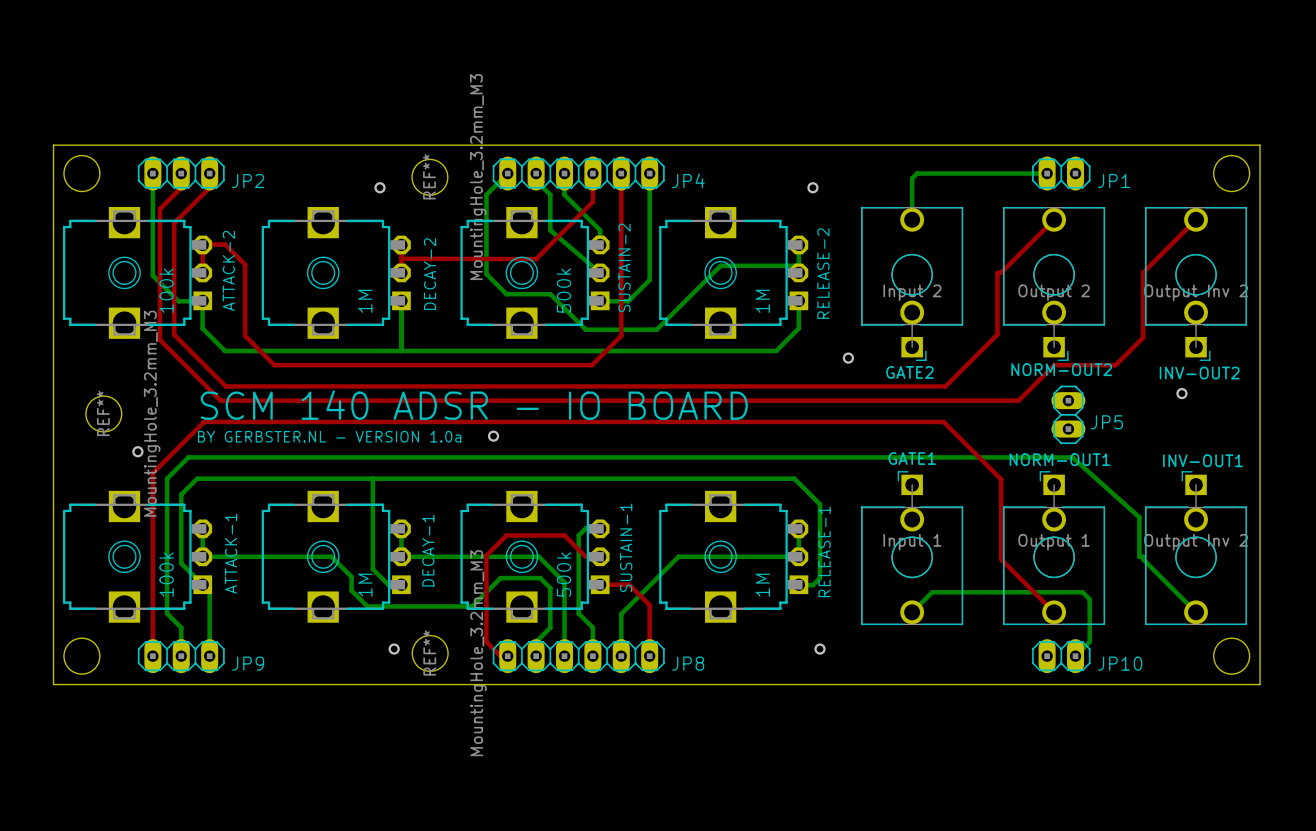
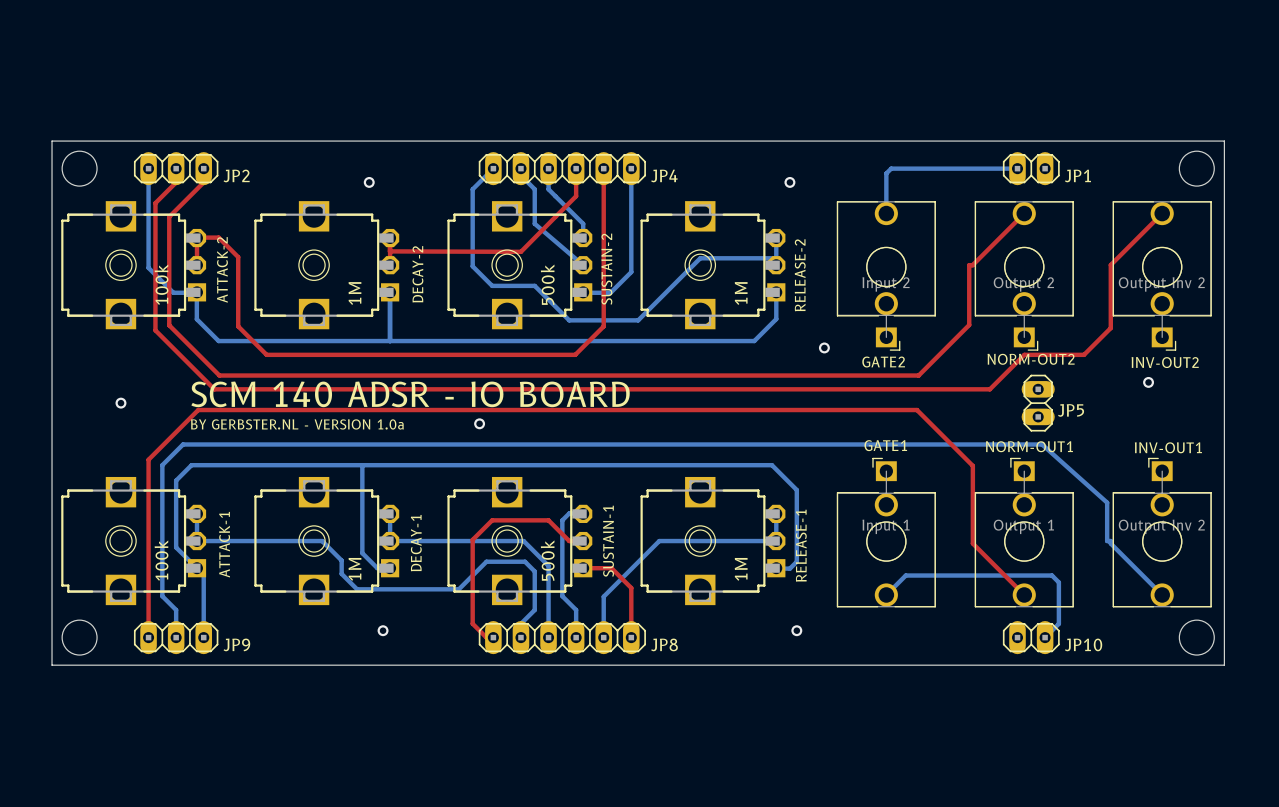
REF**: MountingHole_3.2mm_M3 (429, 177) -> none
REF**: MountingHole_3.2mm_M3 (103, 413) -> none
via position: (137, 451) -> (120, 403)
REF**: MountingHole_3.2mm_M3 (430, 653) -> none

